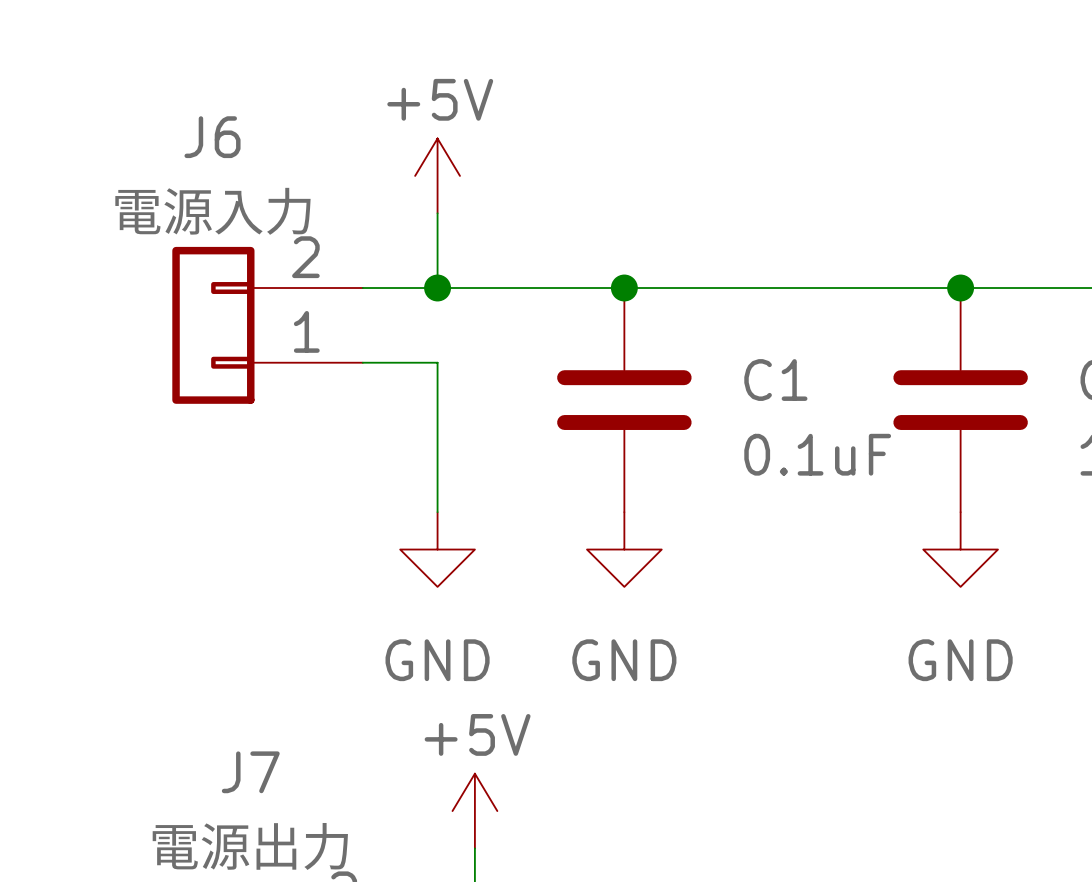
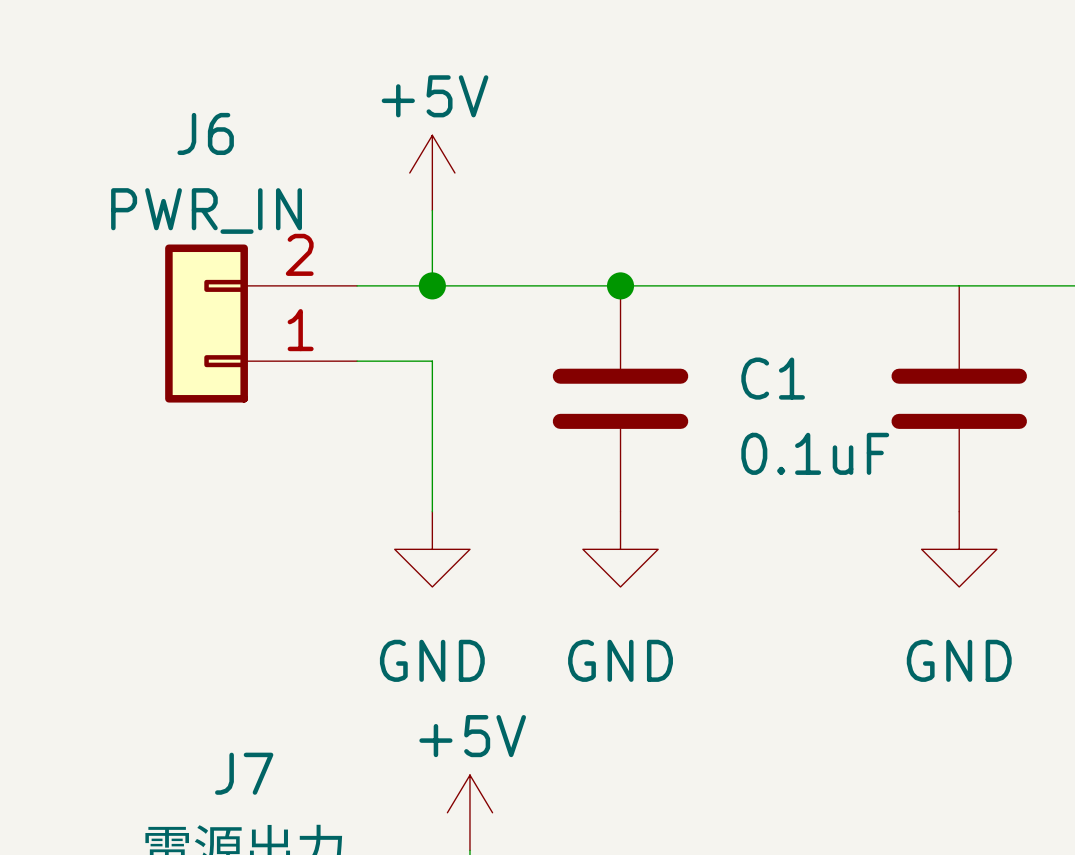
J6 value: 電源入力 (212, 211) -> PWR_IN (206, 211)
junction: (960, 288) -> none

